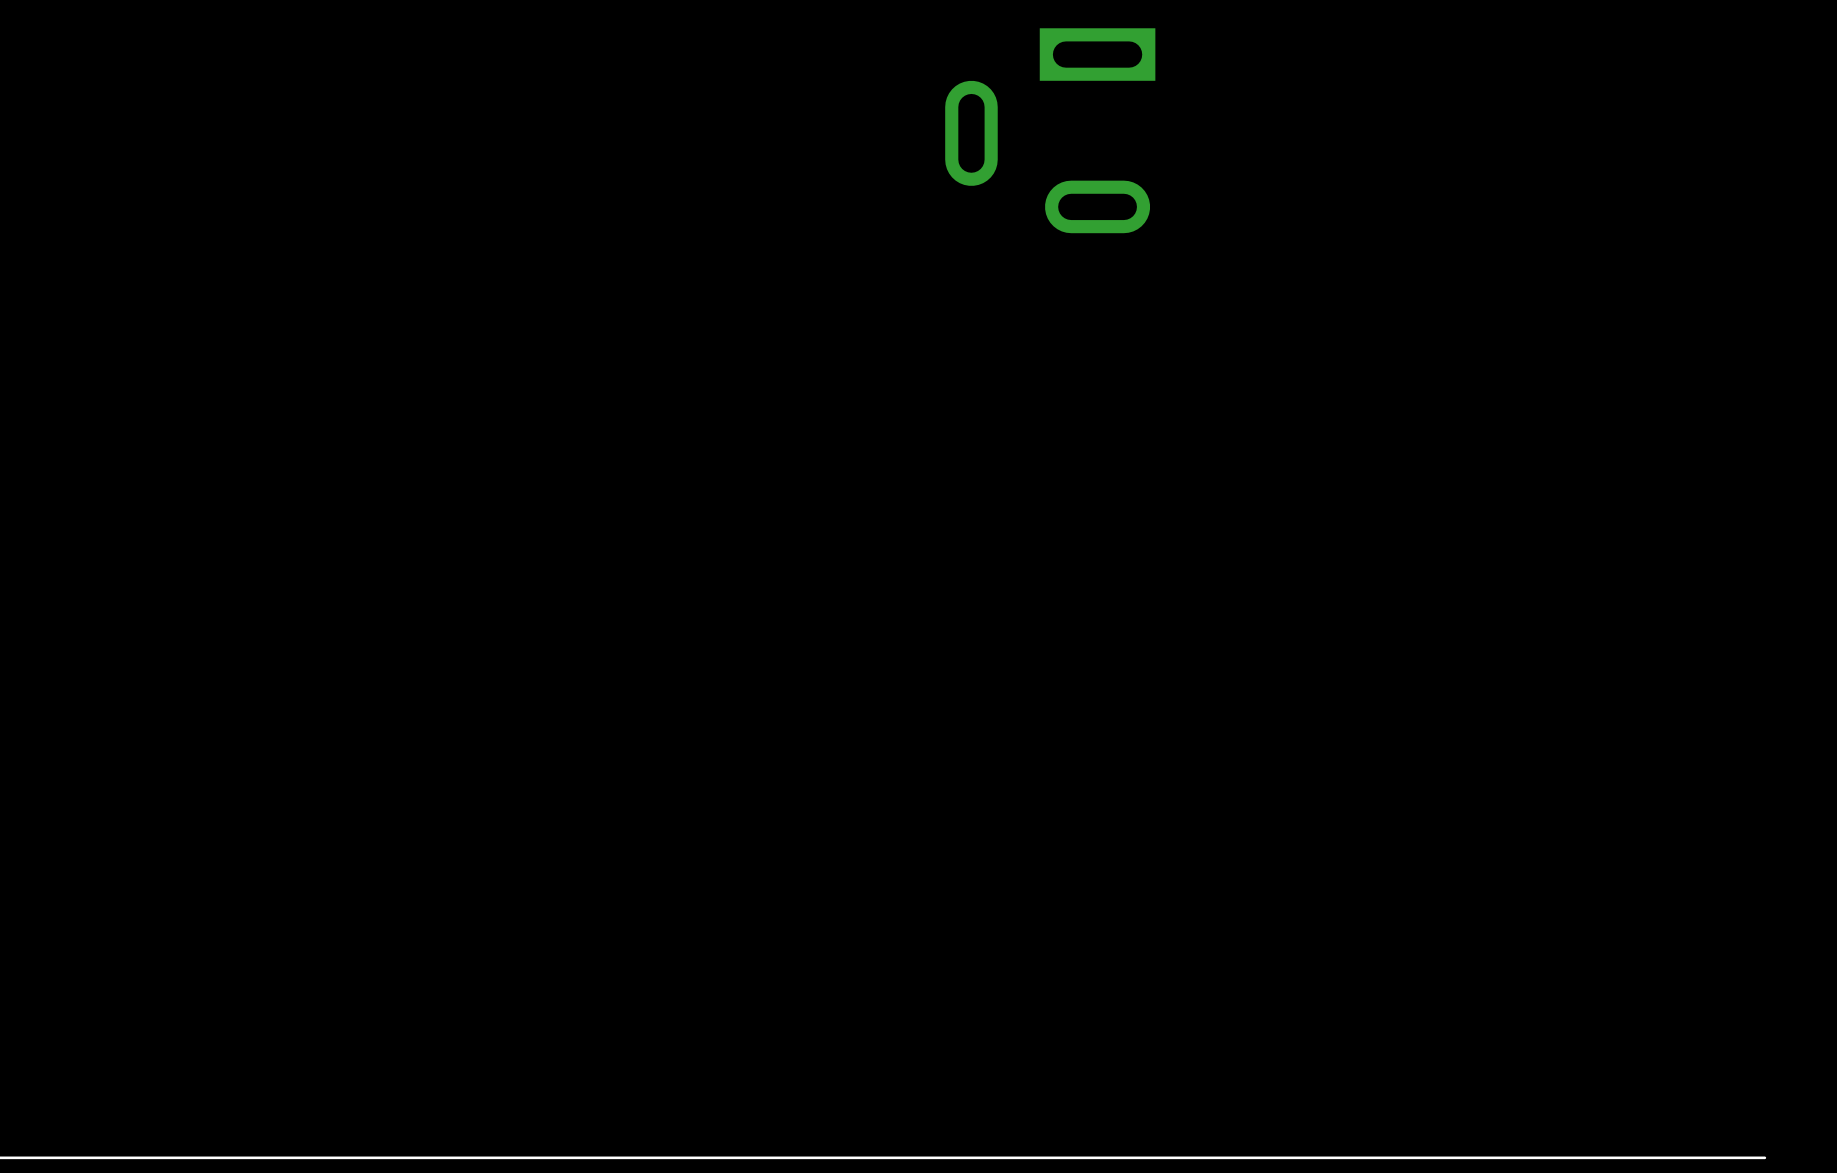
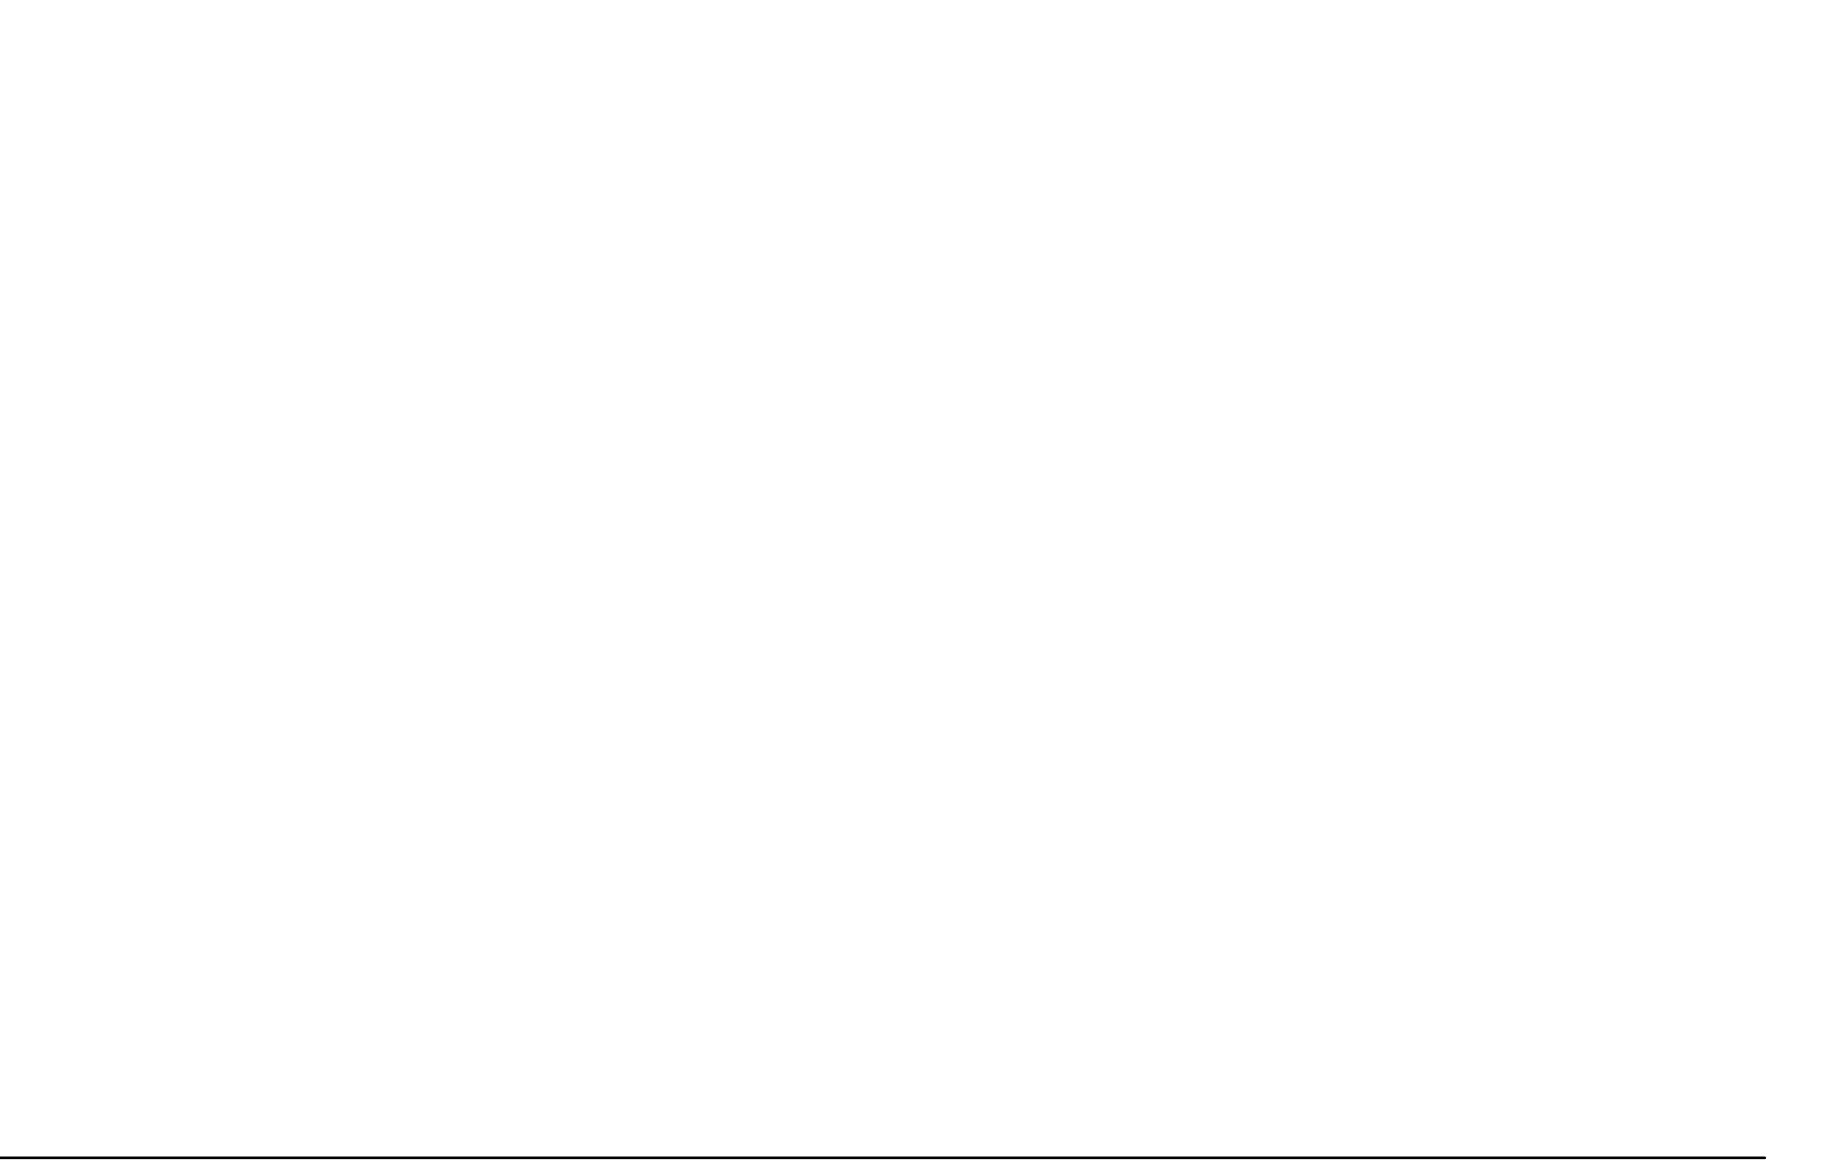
part: (1050, 130) -> none

